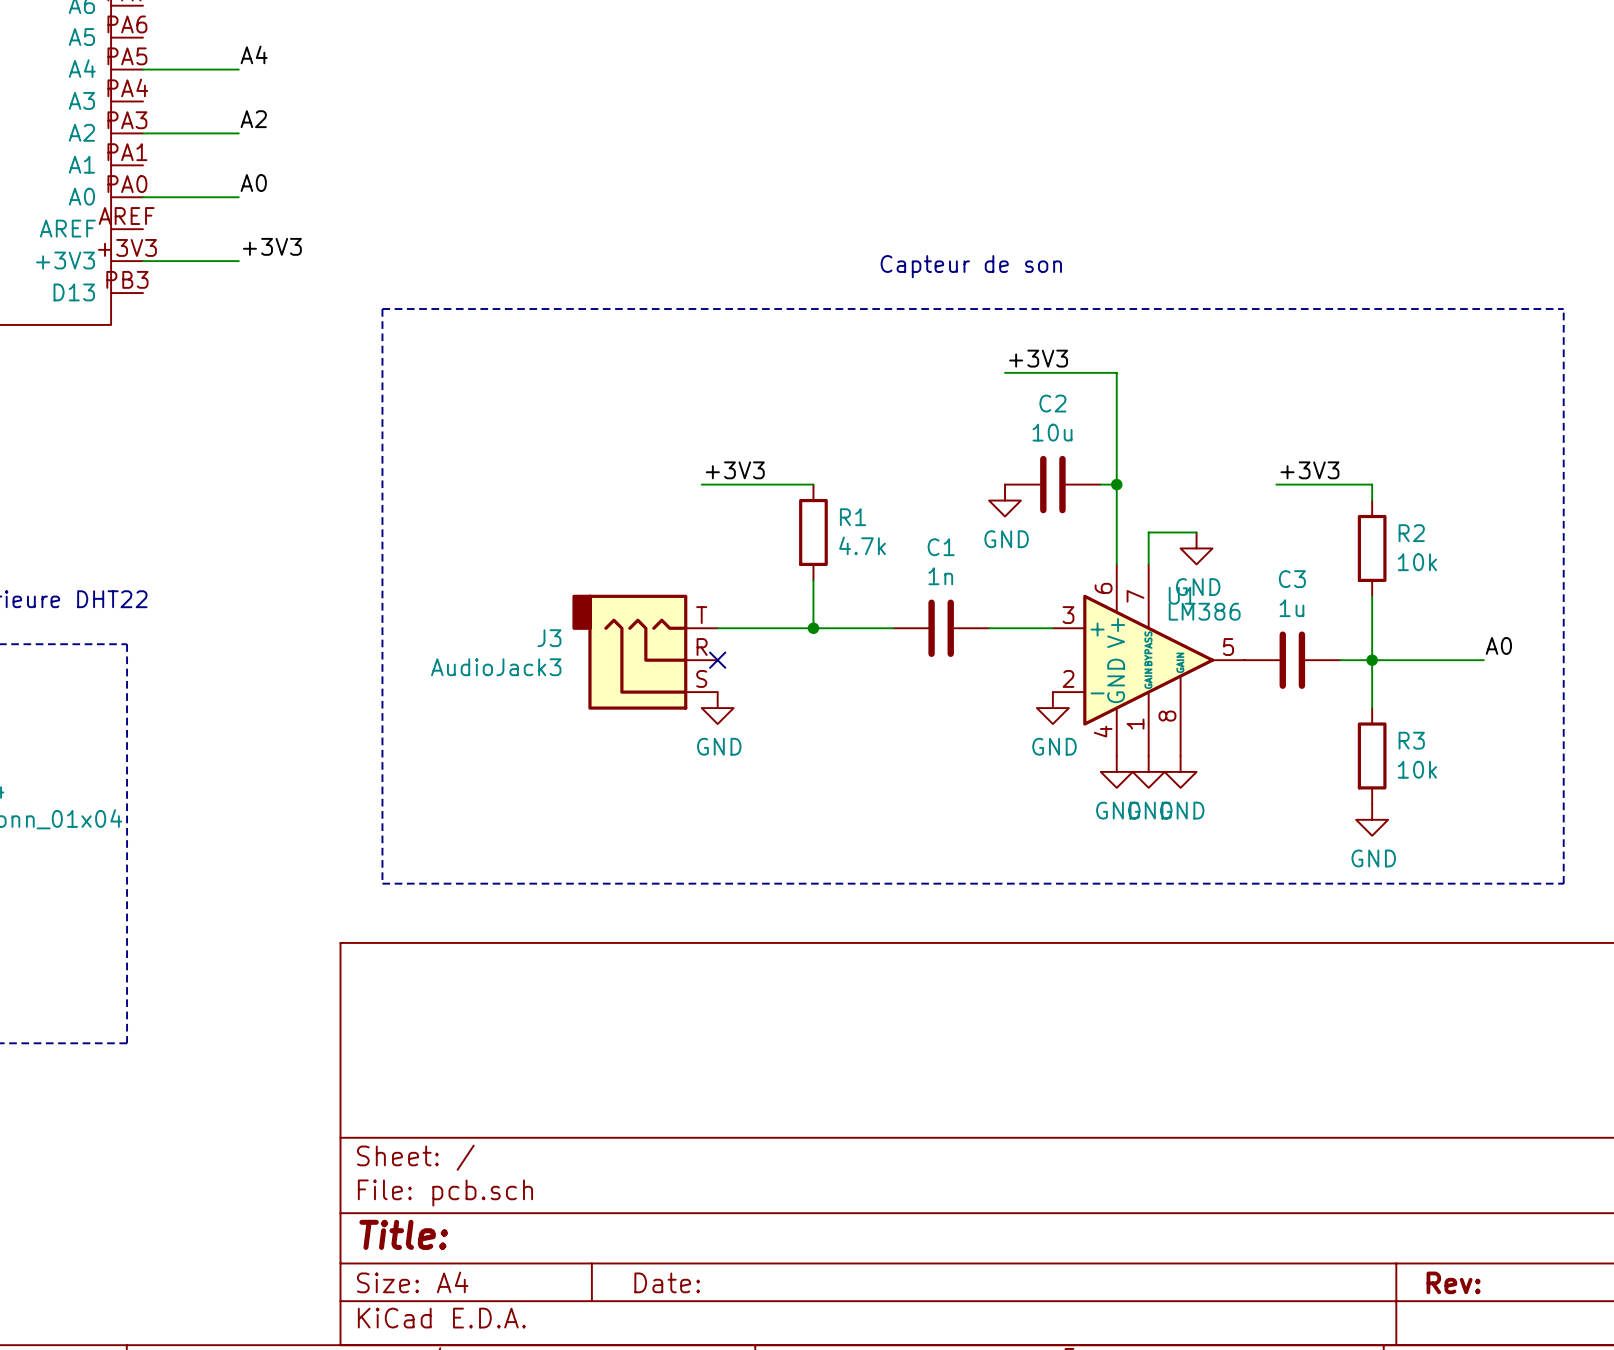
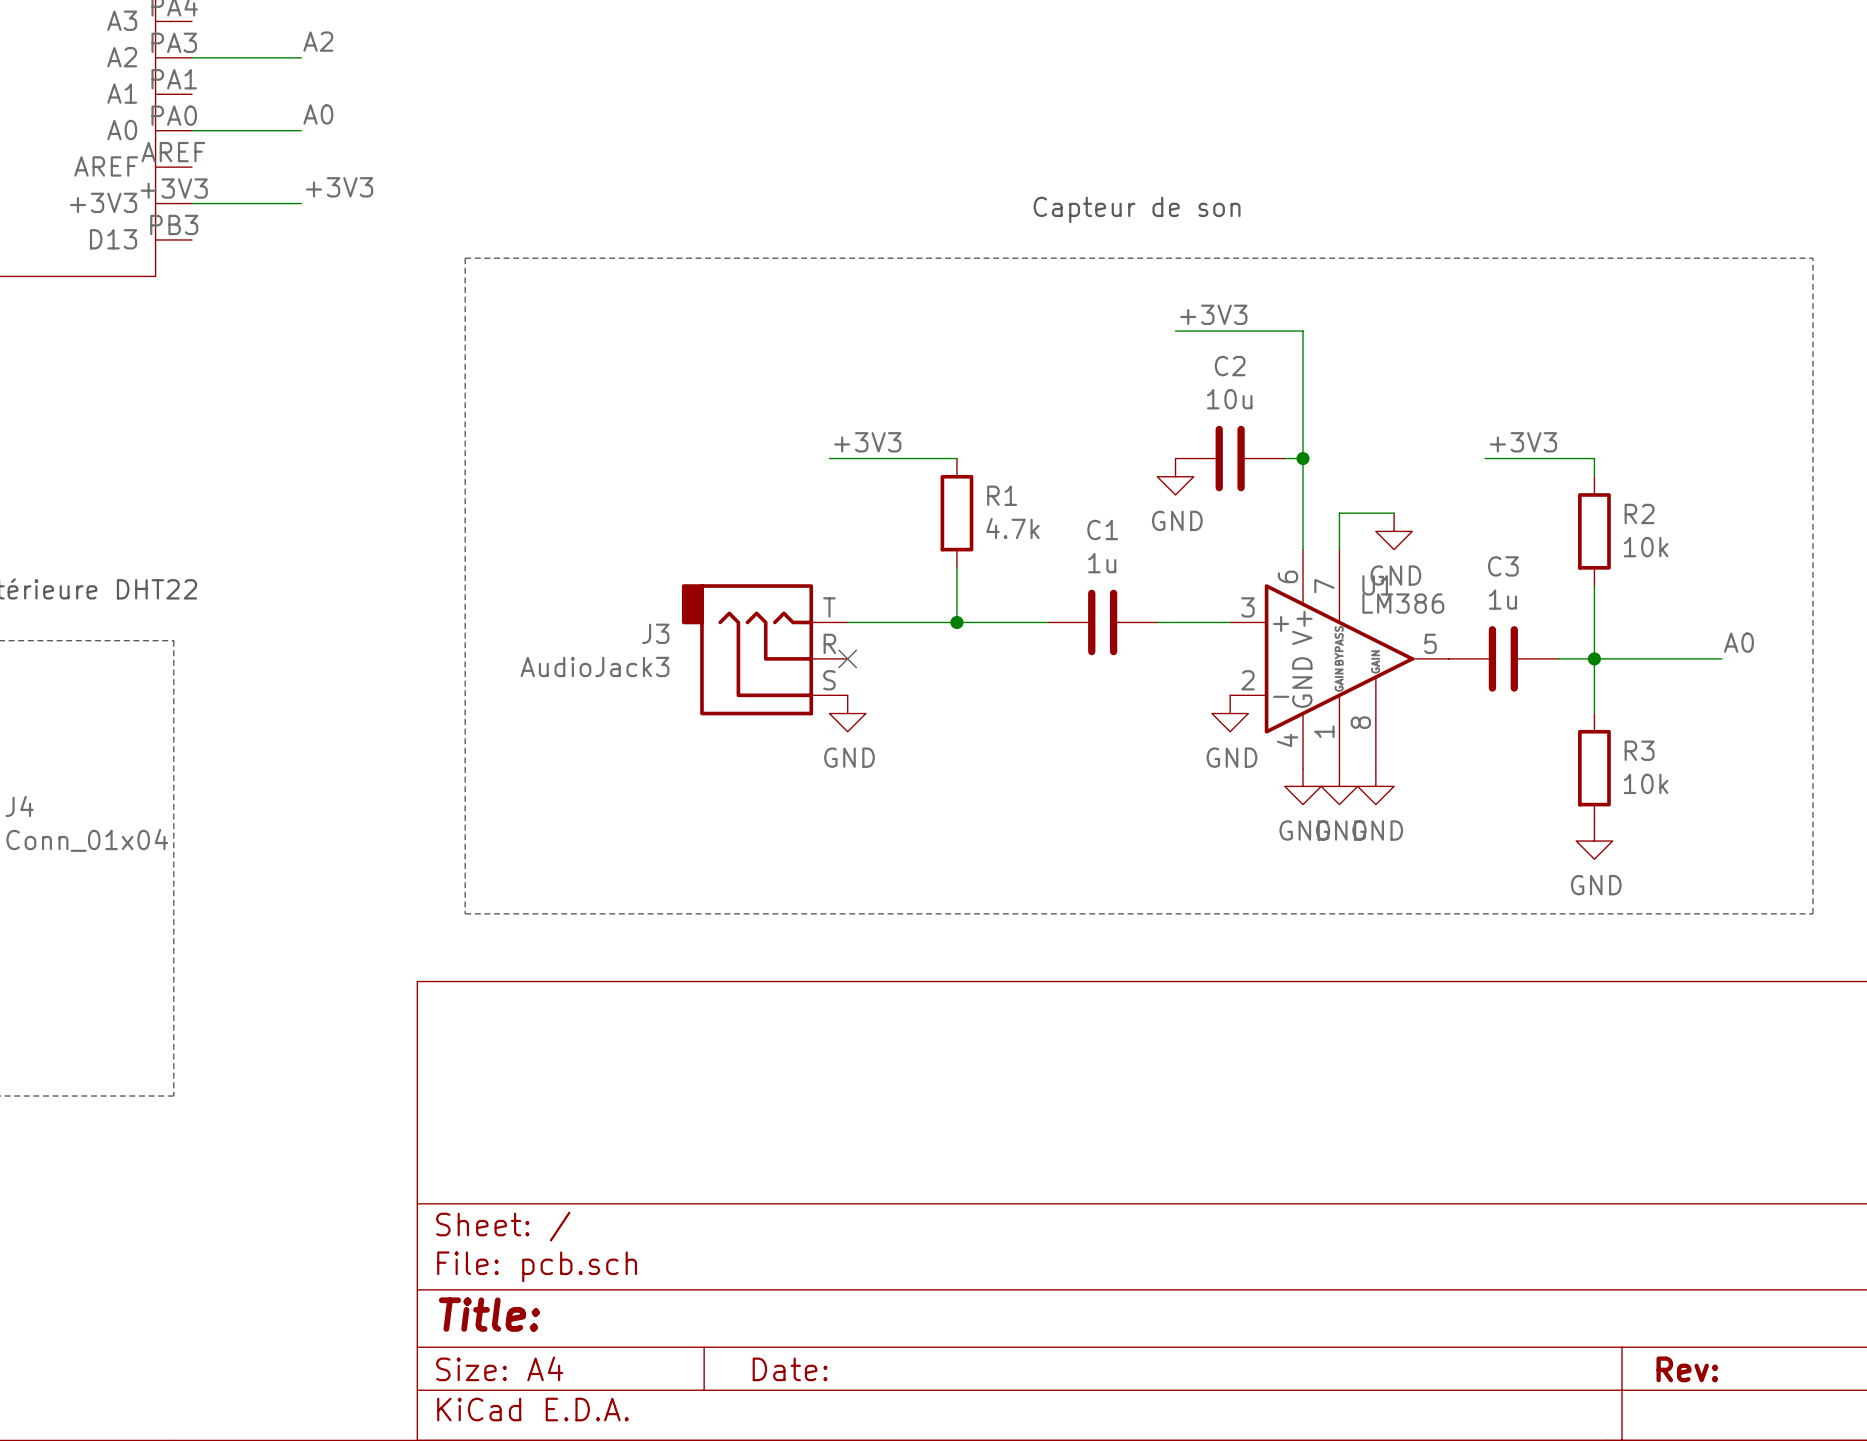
C1 value: 1n (940, 576) -> 1u (1102, 563)

